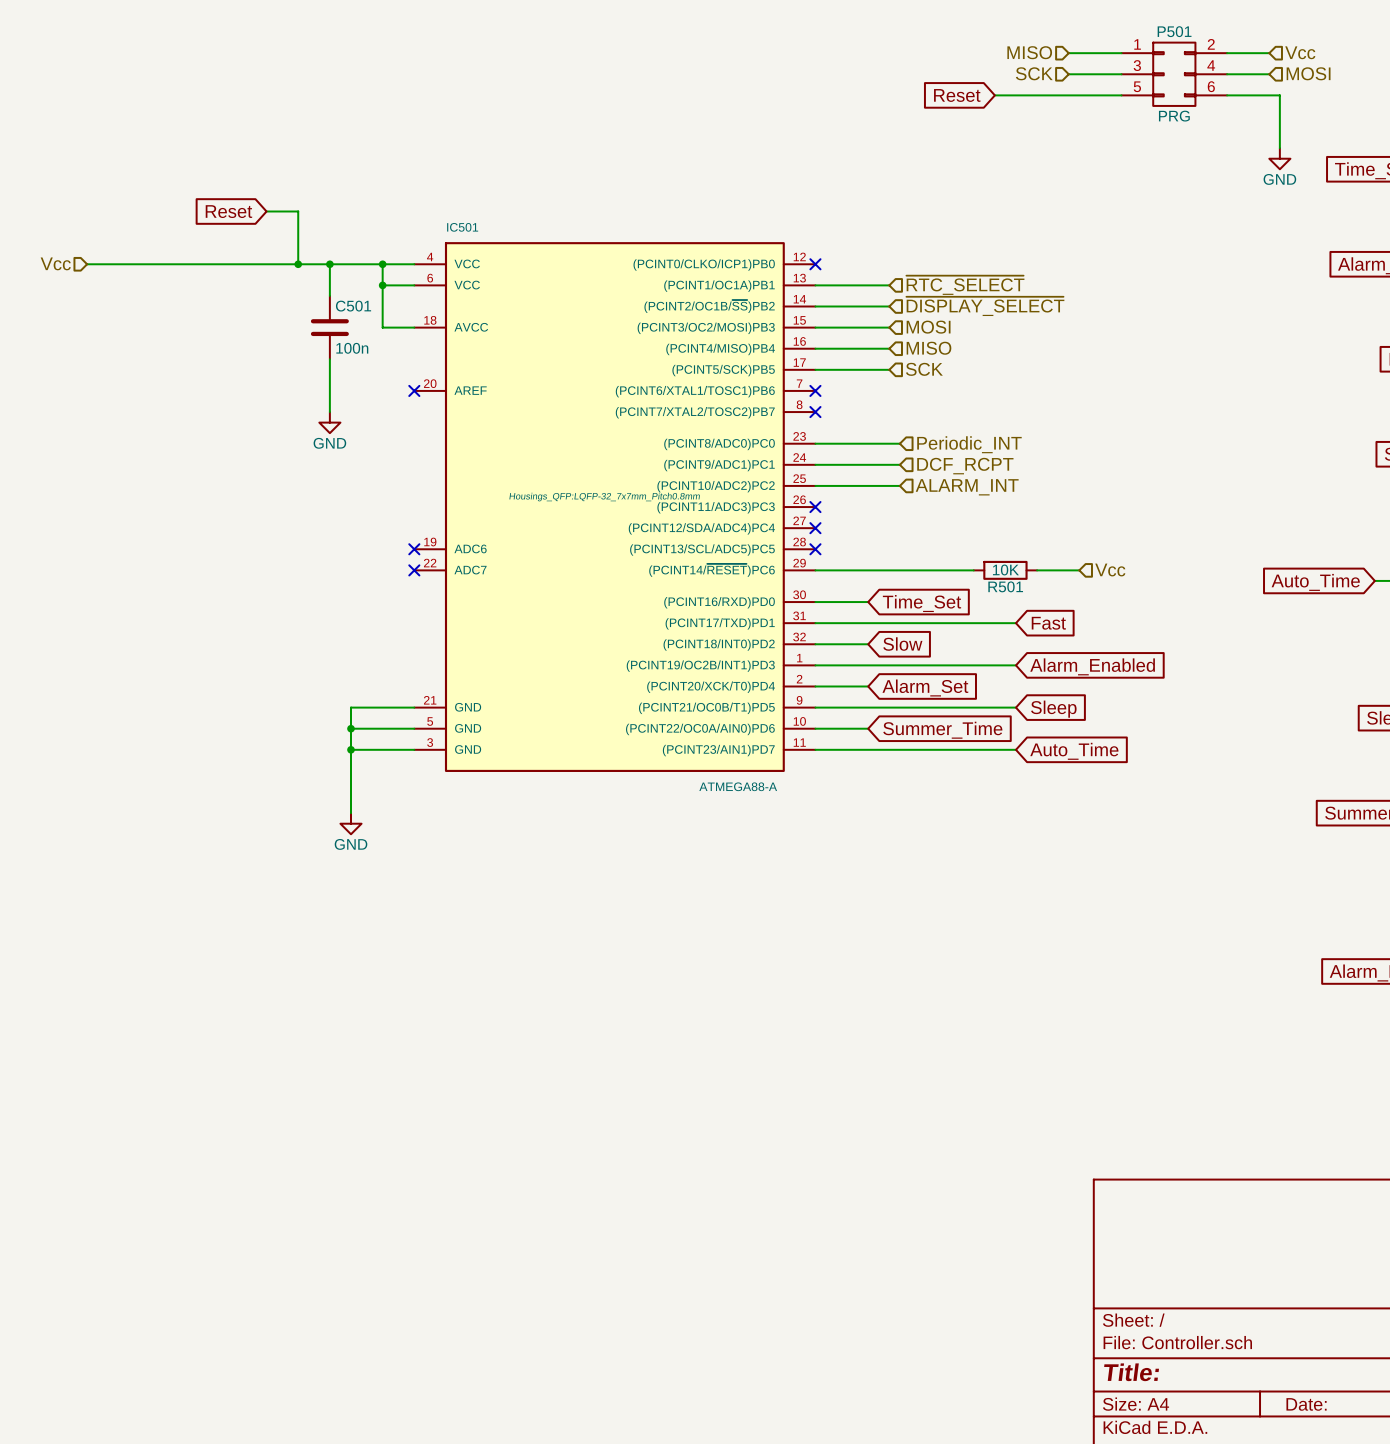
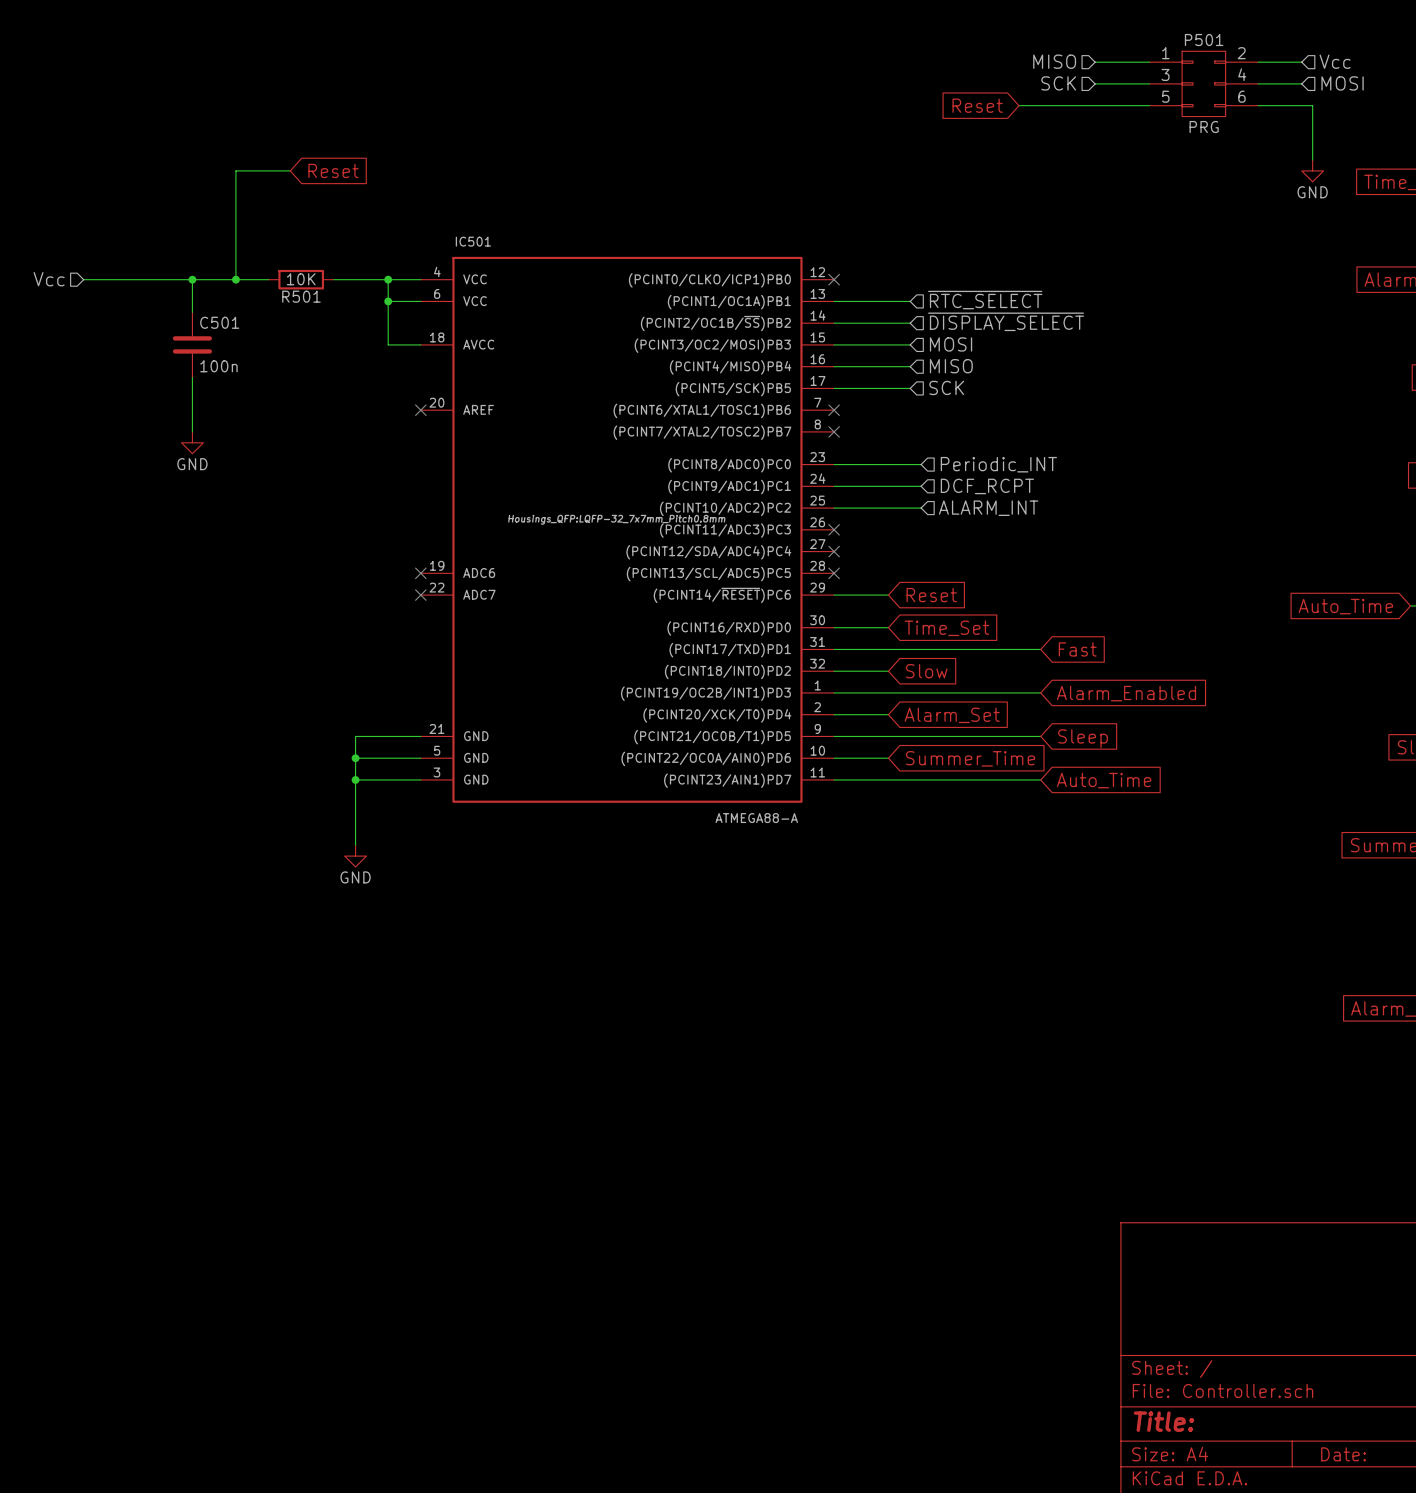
wire: none -> (290, 170) (235, 170) (235, 279)
global label rotation: 0° (228, 211) -> 180° (333, 170)
global label position: Reset (228, 211) -> Reset (333, 170)
wire: (266, 211) (298, 211) (298, 264) -> none
wire: none -> (192, 279) (192, 312)
junction: none -> (192, 279)
junction: none -> (235, 279)
wire: (266, 264) (329, 264) (329, 295) -> none
junction: (298, 264) -> none
junction: (329, 264) -> none
C501 position: (329, 327) -> (192, 344)
wire: (329, 359) (329, 412) -> (192, 377) (192, 431)
power symbol position: GND (329, 422) -> GND (192, 442)
wire: (868, 570) (973, 570) -> none
global label: none -> Reset (931, 595)
R501 position: (1005, 570) -> (301, 279)
wire: (1037, 570) (1079, 570) -> none
hierarchical label: Vcc (1110, 570) -> none

